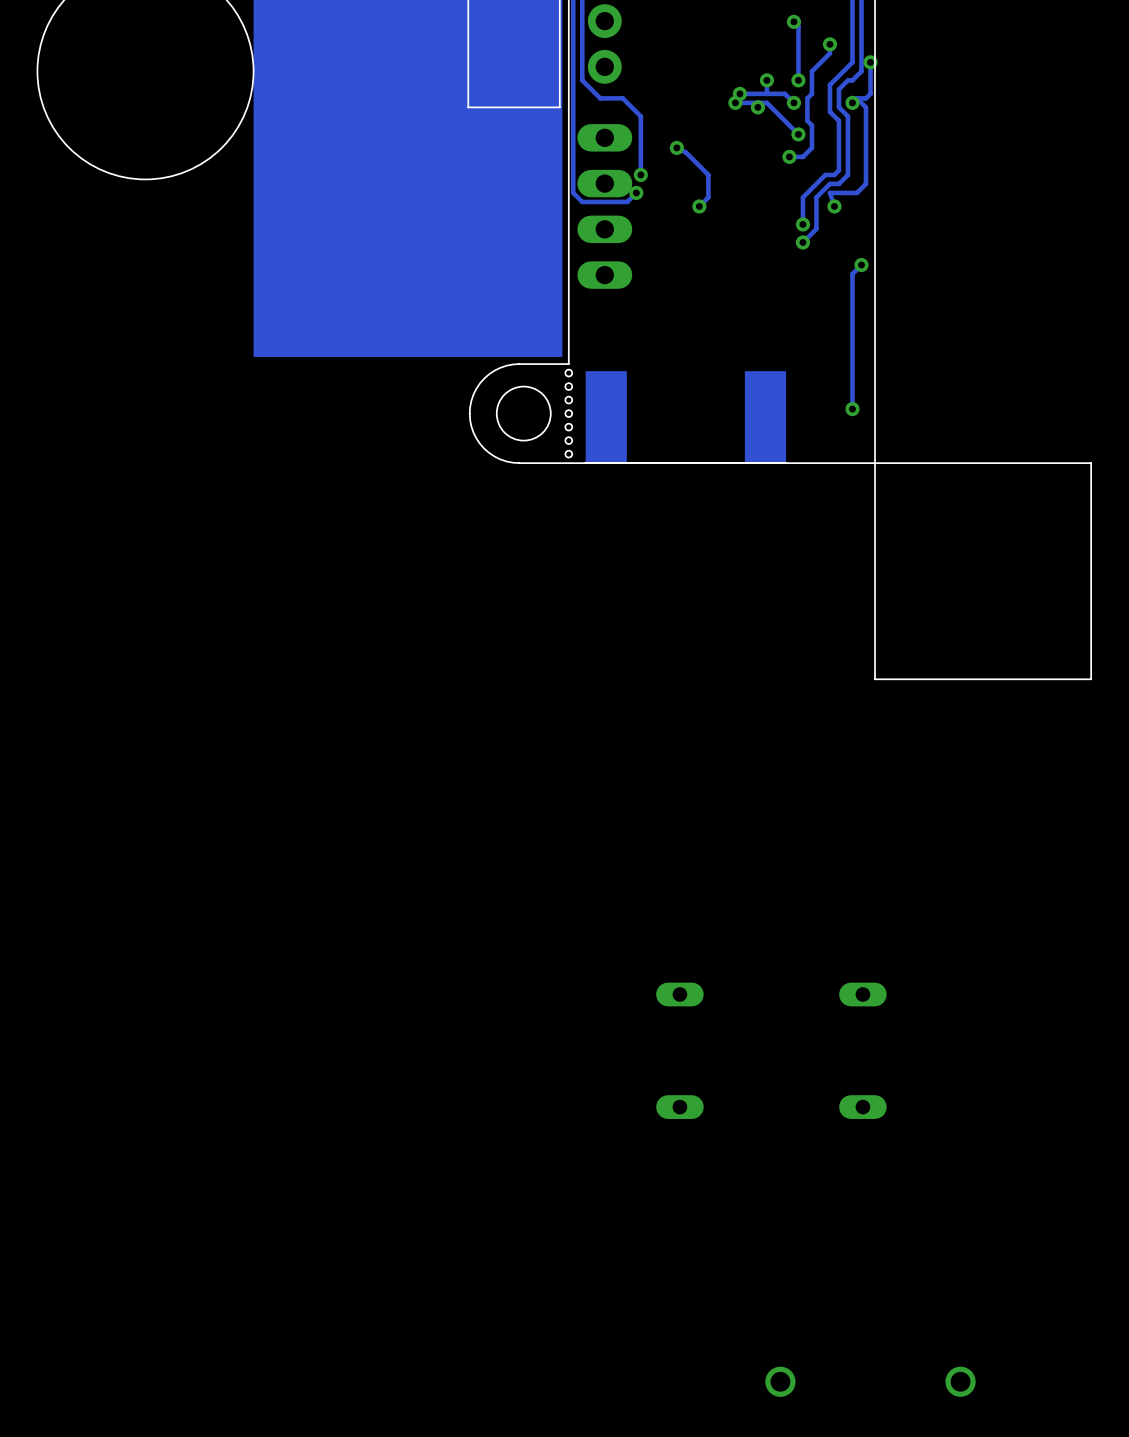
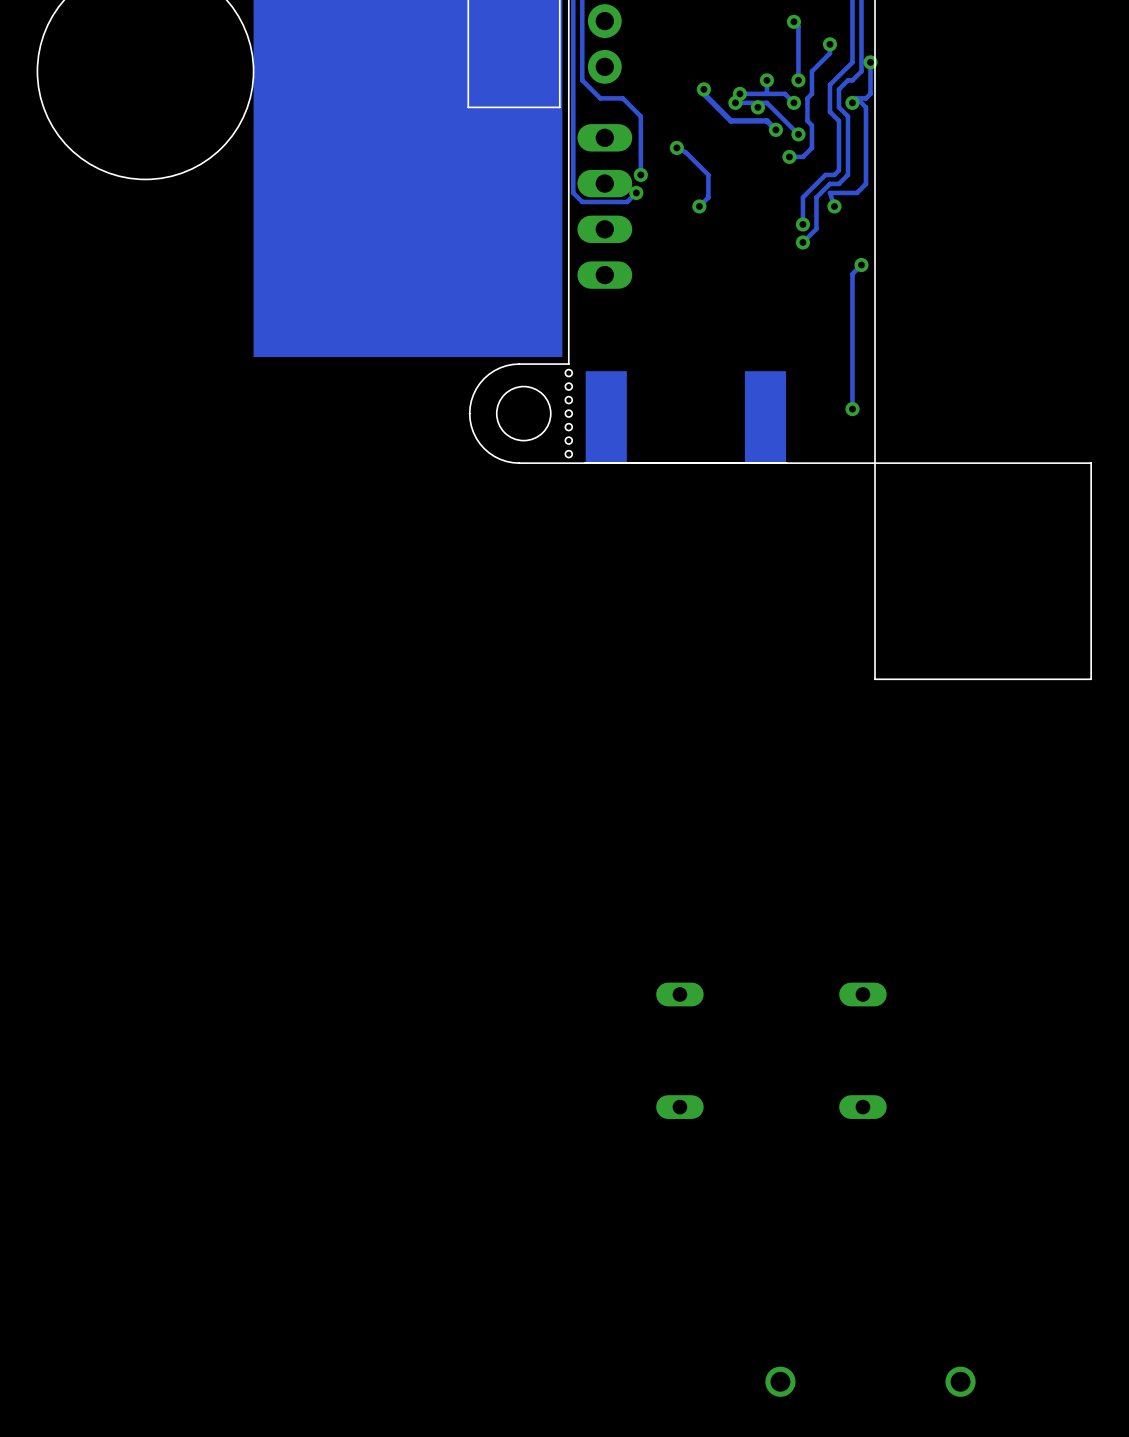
track: none -> (703, 89) (703, 93) (730, 120) (766, 120) (775, 129)
via: none -> (703, 89)
via: none -> (775, 129)

